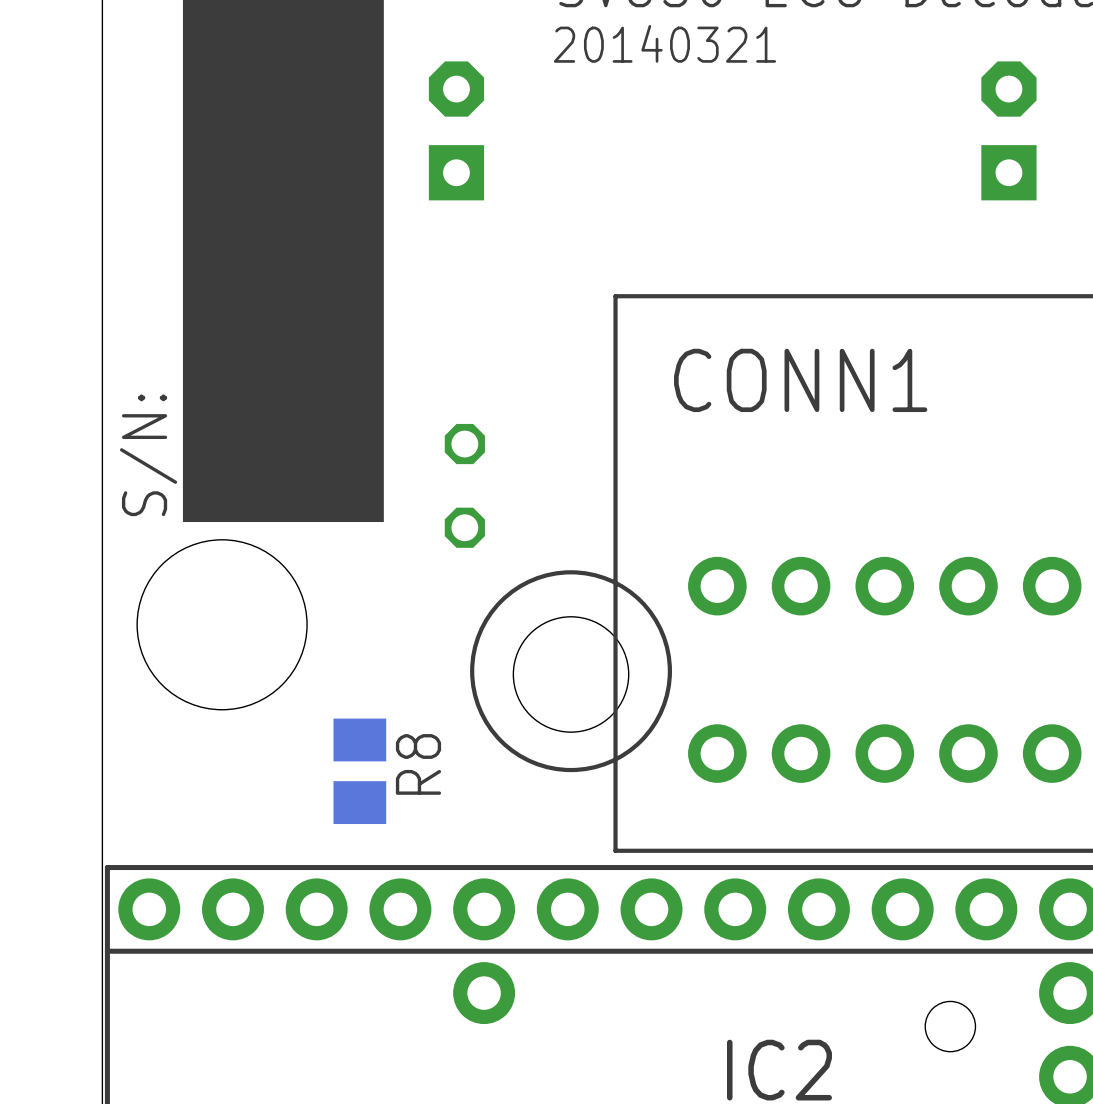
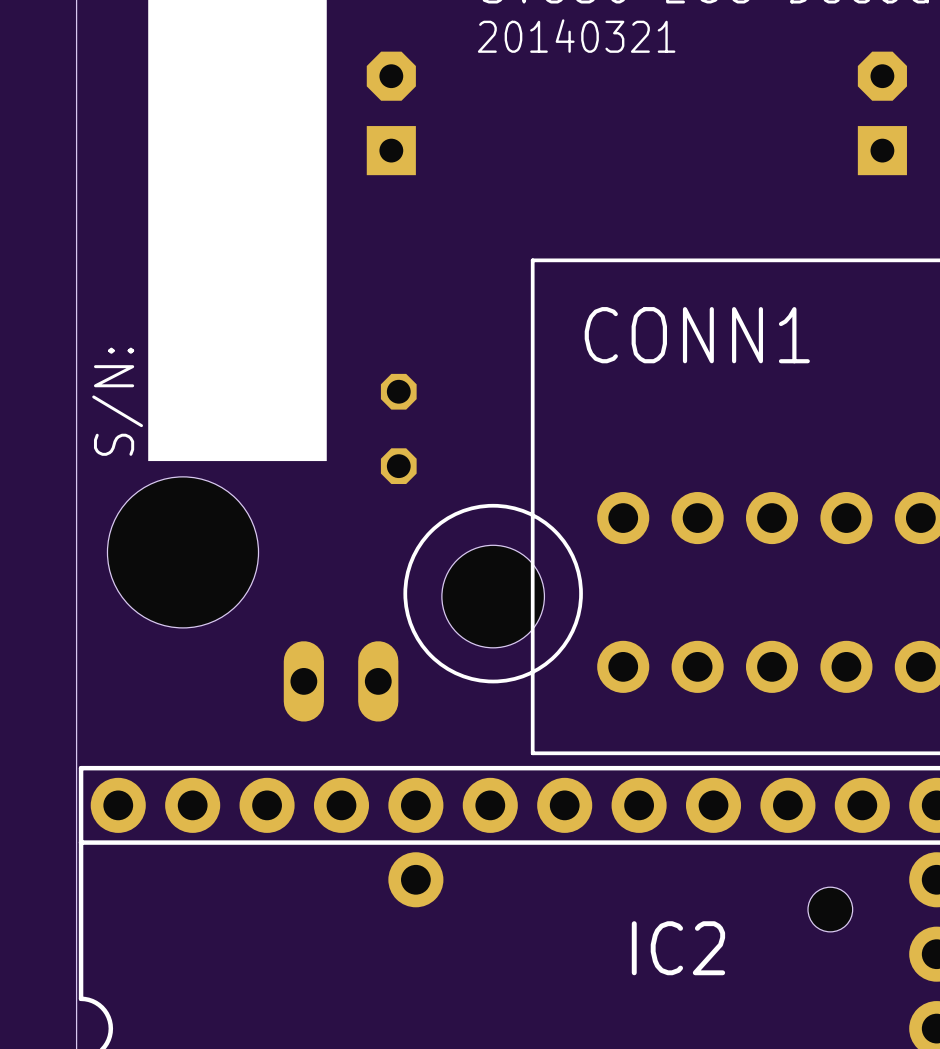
part: none -> (341, 681)
R8: (359, 771) -> none

